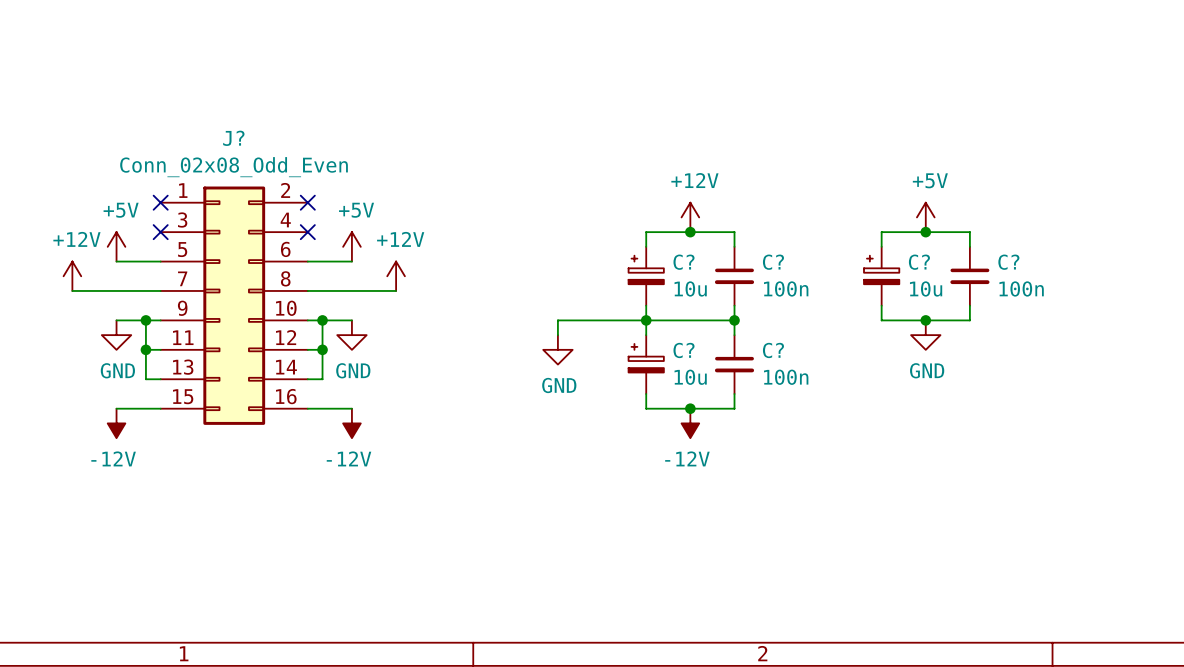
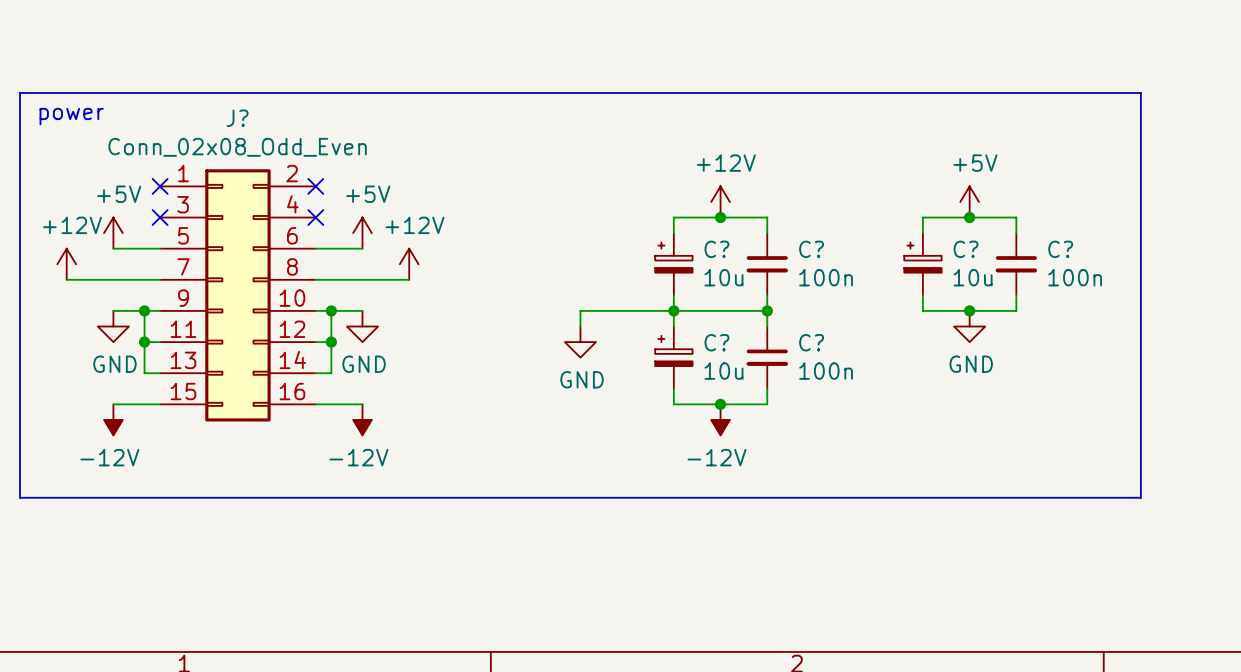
line: none -> (20, 92) (20, 497) (1140, 497) (1140, 92) (20, 92)
text: none -> power (71, 116)

